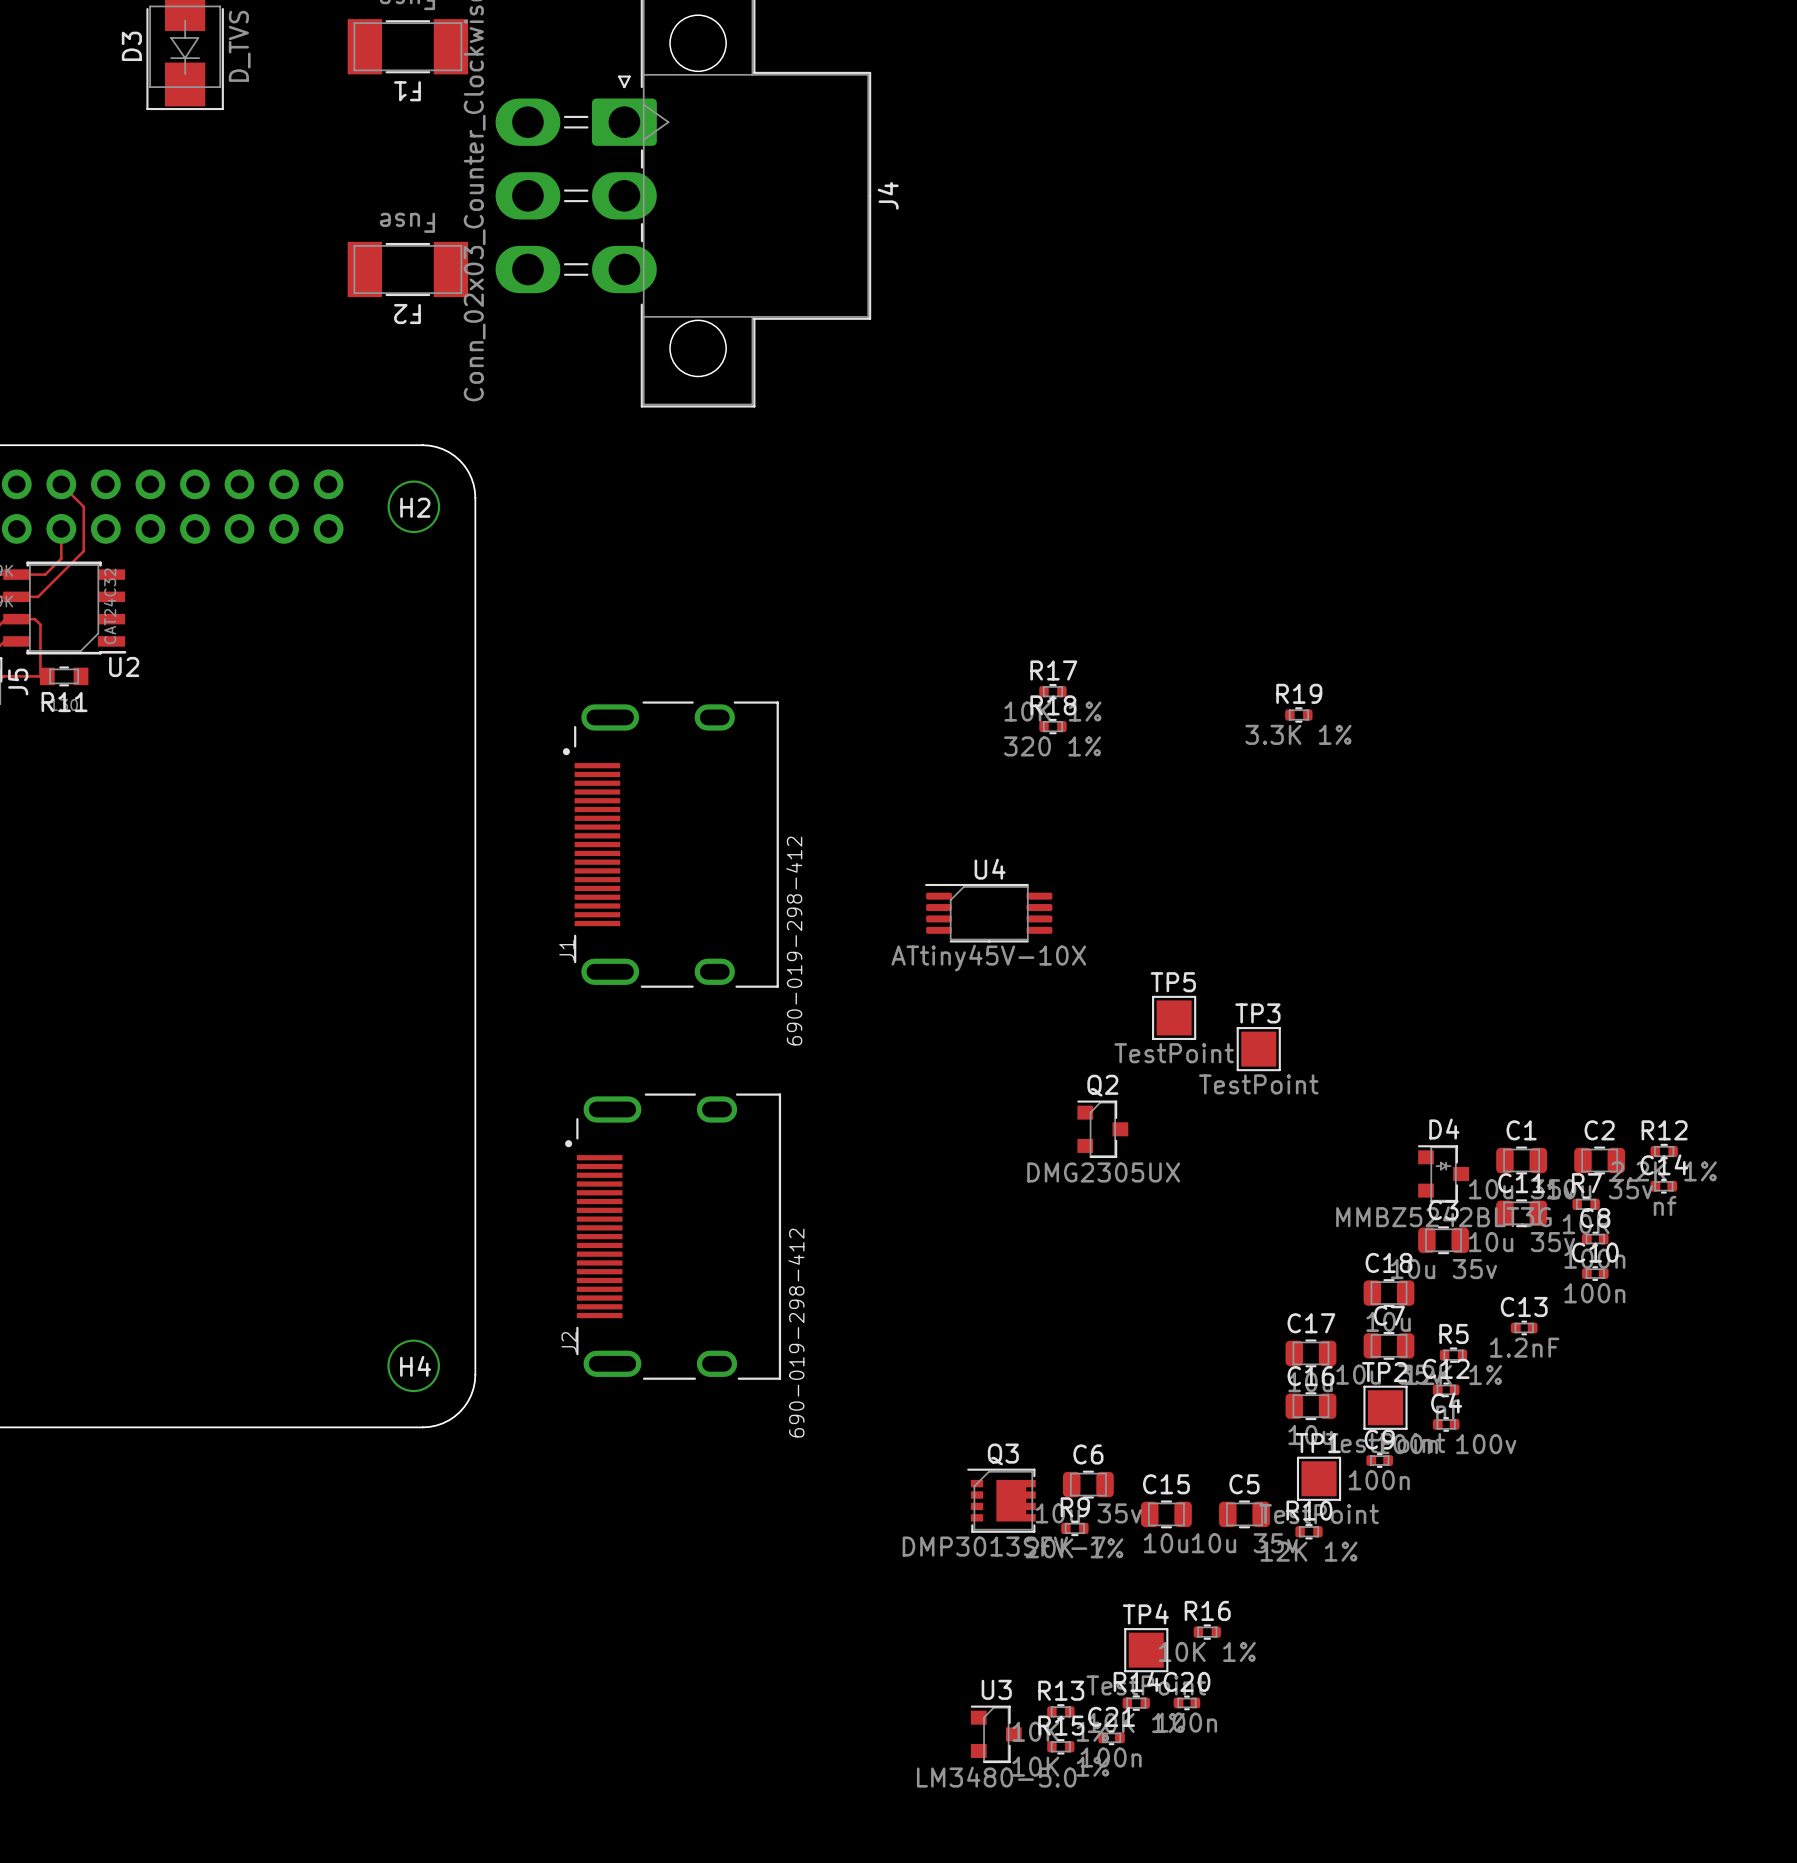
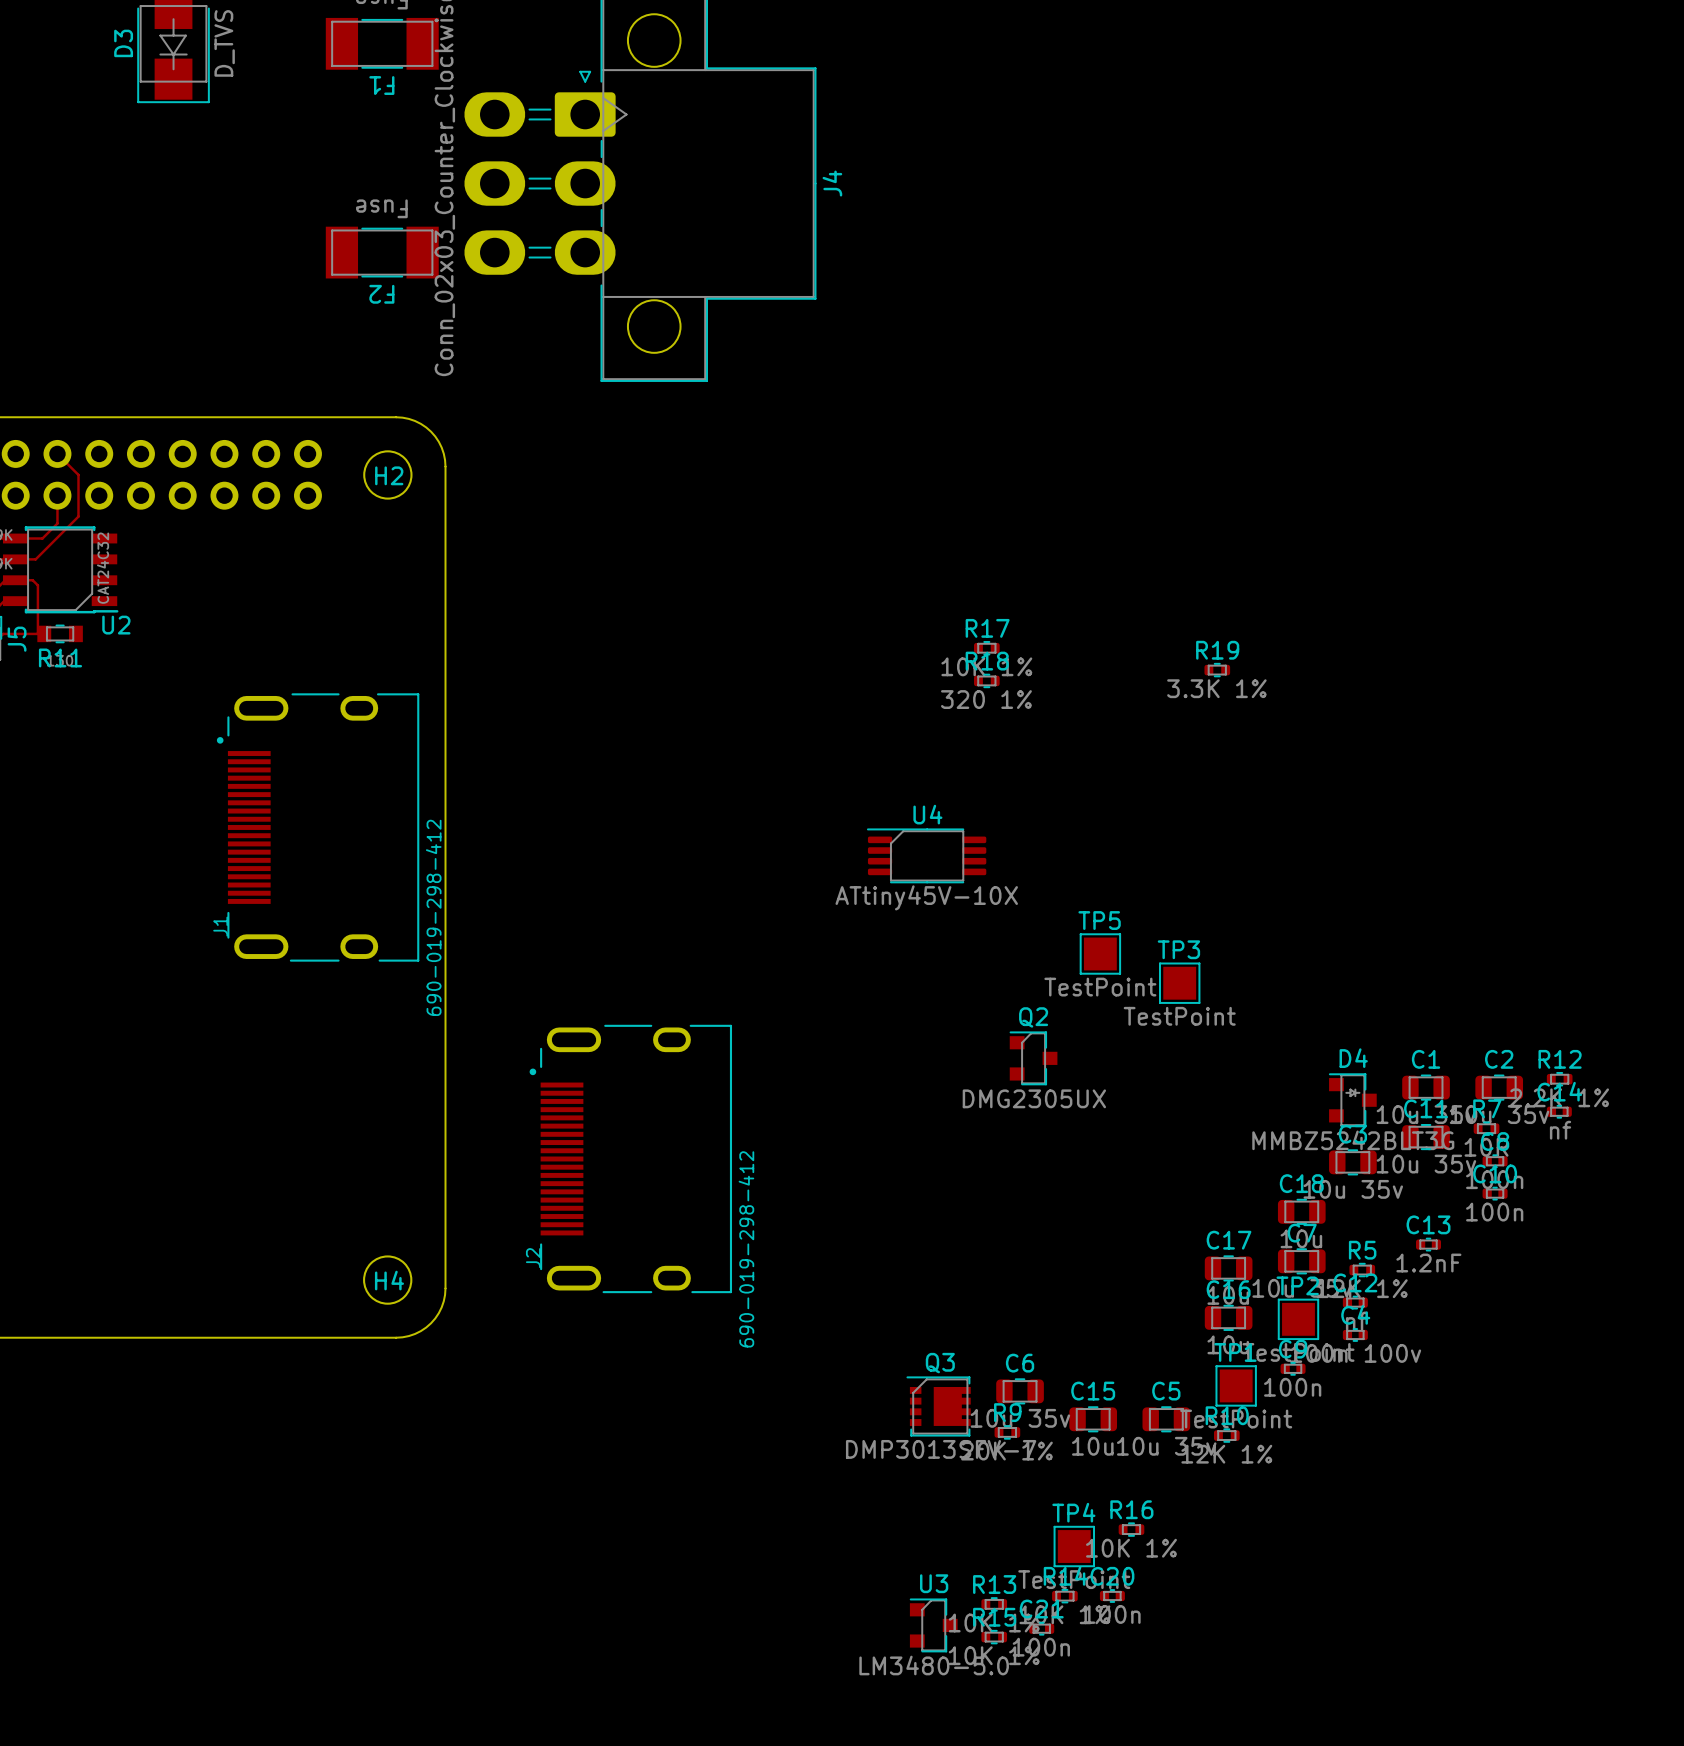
J1 position: (670, 844) -> (318, 827)

